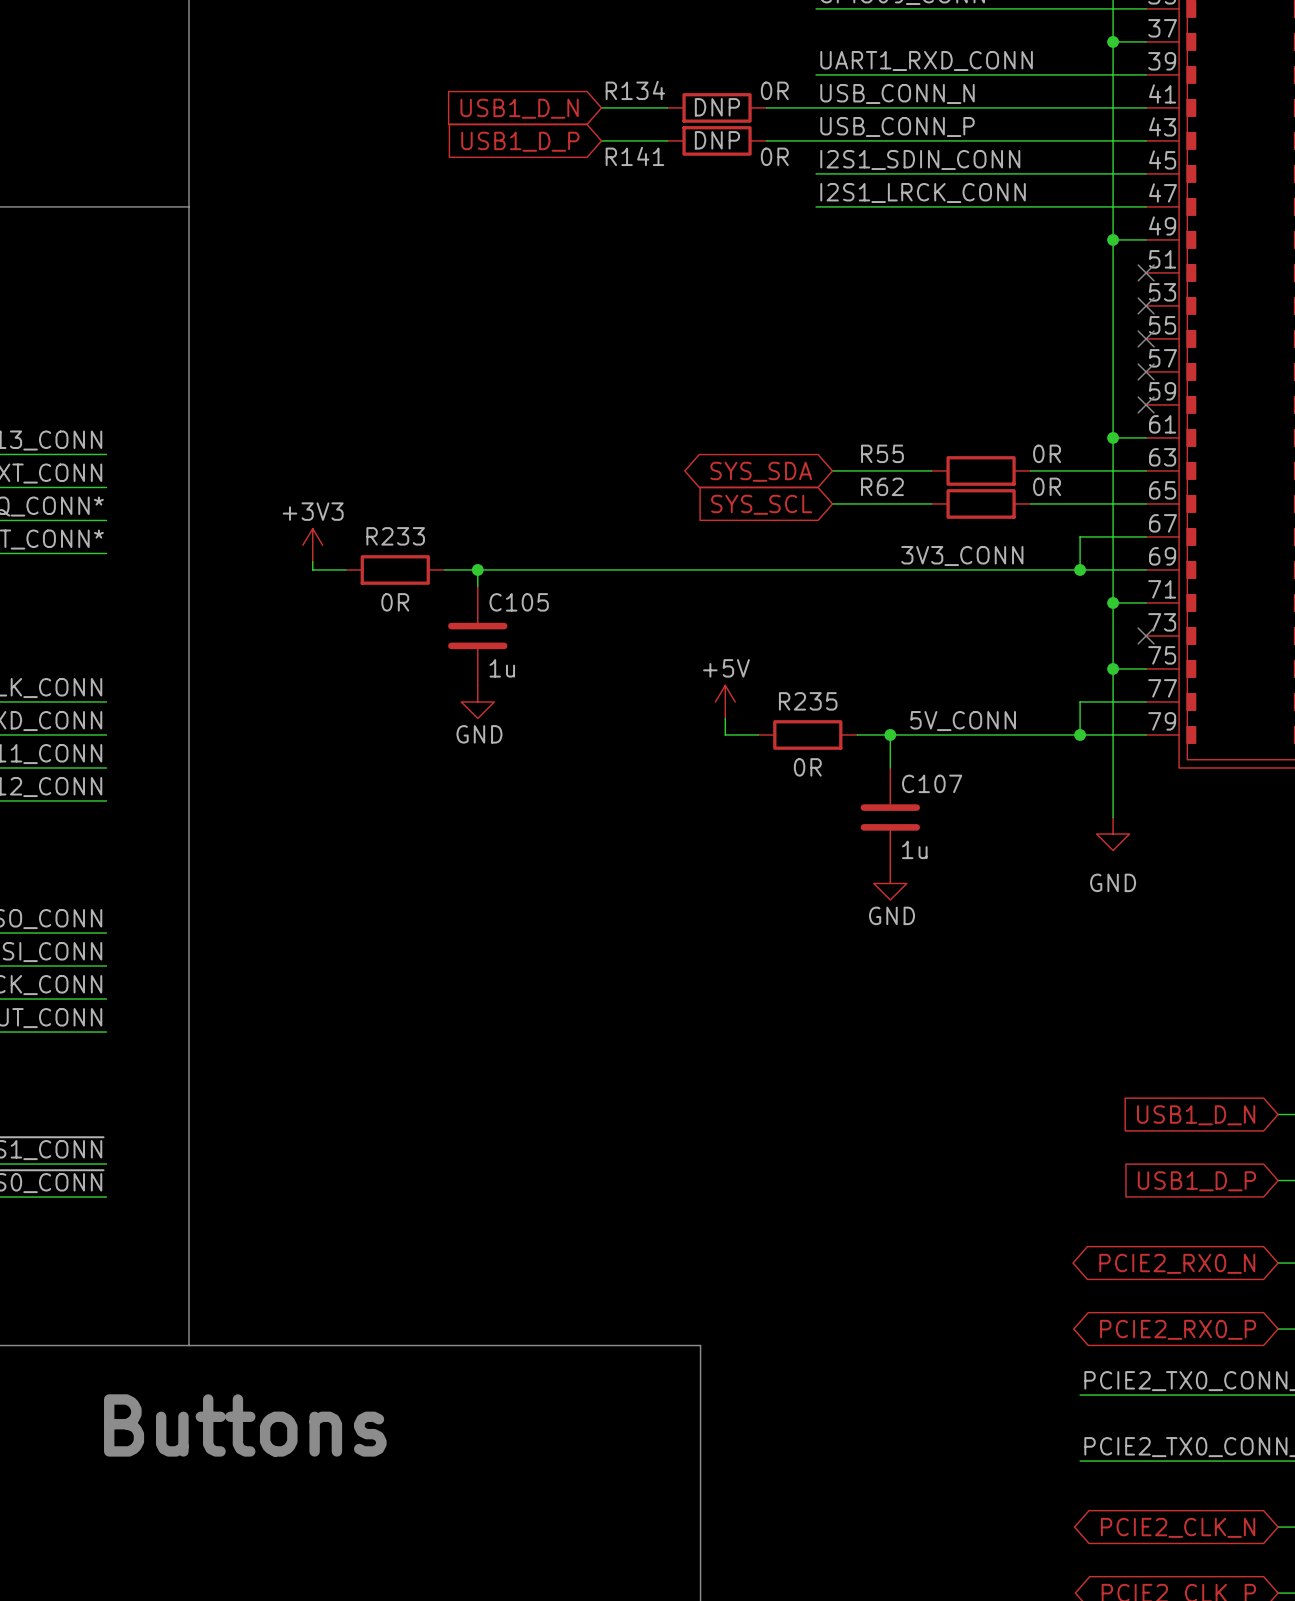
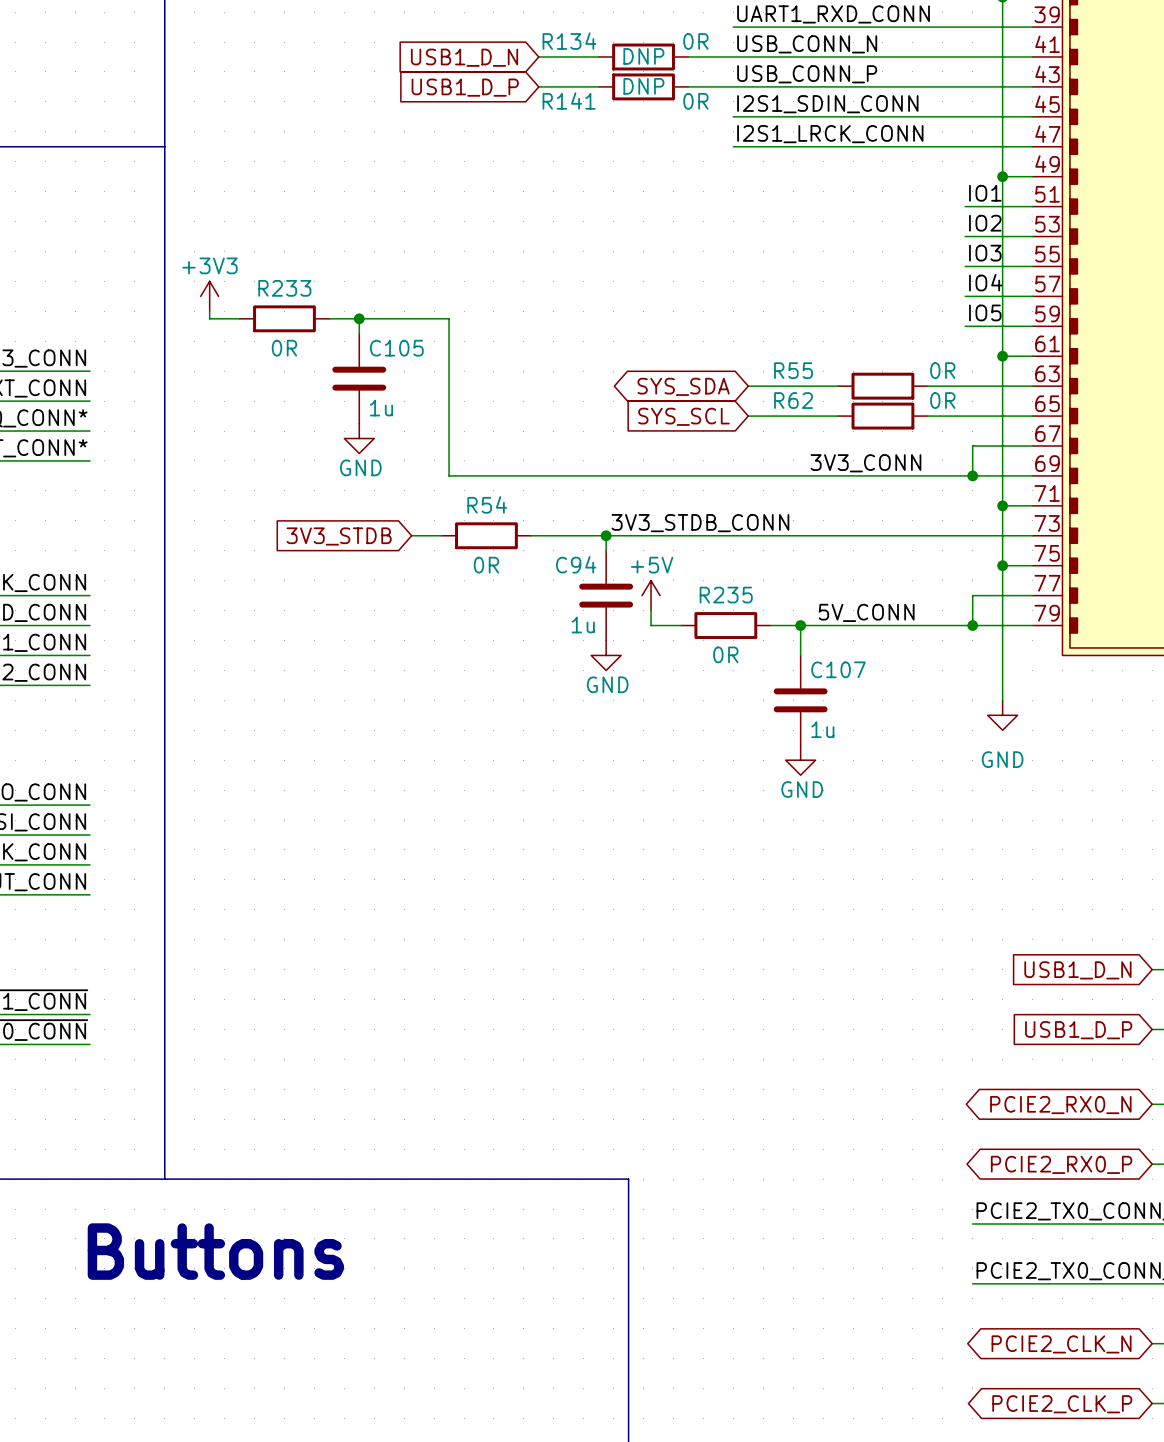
label: none -> IO1 (985, 193)
wire: none -> (965, 206) (1032, 206)
no-connect mark: (1146, 272) -> none
label: none -> IO2 (985, 223)
wire: none -> (965, 236) (1032, 236)
no-connect mark: (1146, 305) -> none
label: none -> IO3 (985, 253)
wire: none -> (965, 266) (1032, 266)
no-connect mark: (1146, 338) -> none
label: none -> IO4 (985, 282)
wire: none -> (965, 296) (1032, 296)
no-connect mark: (1146, 371) -> none
label: none -> IO5 (985, 312)
junction: none -> (359, 318)
wire: none -> (965, 326) (1032, 326)
no-connect mark: (1146, 404) -> none
power symbol: none -> GND (359, 438)
power symbol position: +3V3 (312, 545) -> +3V3 (209, 296)
wire: (312, 561) (312, 569) (345, 569) -> (209, 311) (209, 318) (239, 318)
R233 position: (395, 569) -> (284, 318)
wire: (444, 569) (502, 569) -> (329, 318) (449, 318) (449, 475)
wire: (477, 569) (477, 586) -> (359, 318) (359, 333)
junction: (477, 569) -> none
label: none -> 3V3_STDB_CONN (700, 523)
wire: none -> (411, 535) (441, 535)
C105 position: (477, 635) -> (359, 378)
R54: none -> (486, 535)
wire: none -> (531, 535) (1032, 535)
wire: none -> (606, 535) (606, 550)
junction: none -> (606, 535)
no-connect mark: (1146, 635) -> none
global label: none -> 3V3_STDB (339, 536)
power symbol: GND (477, 701) -> none
C94: none -> (606, 595)
power symbol: none -> GND (606, 655)

